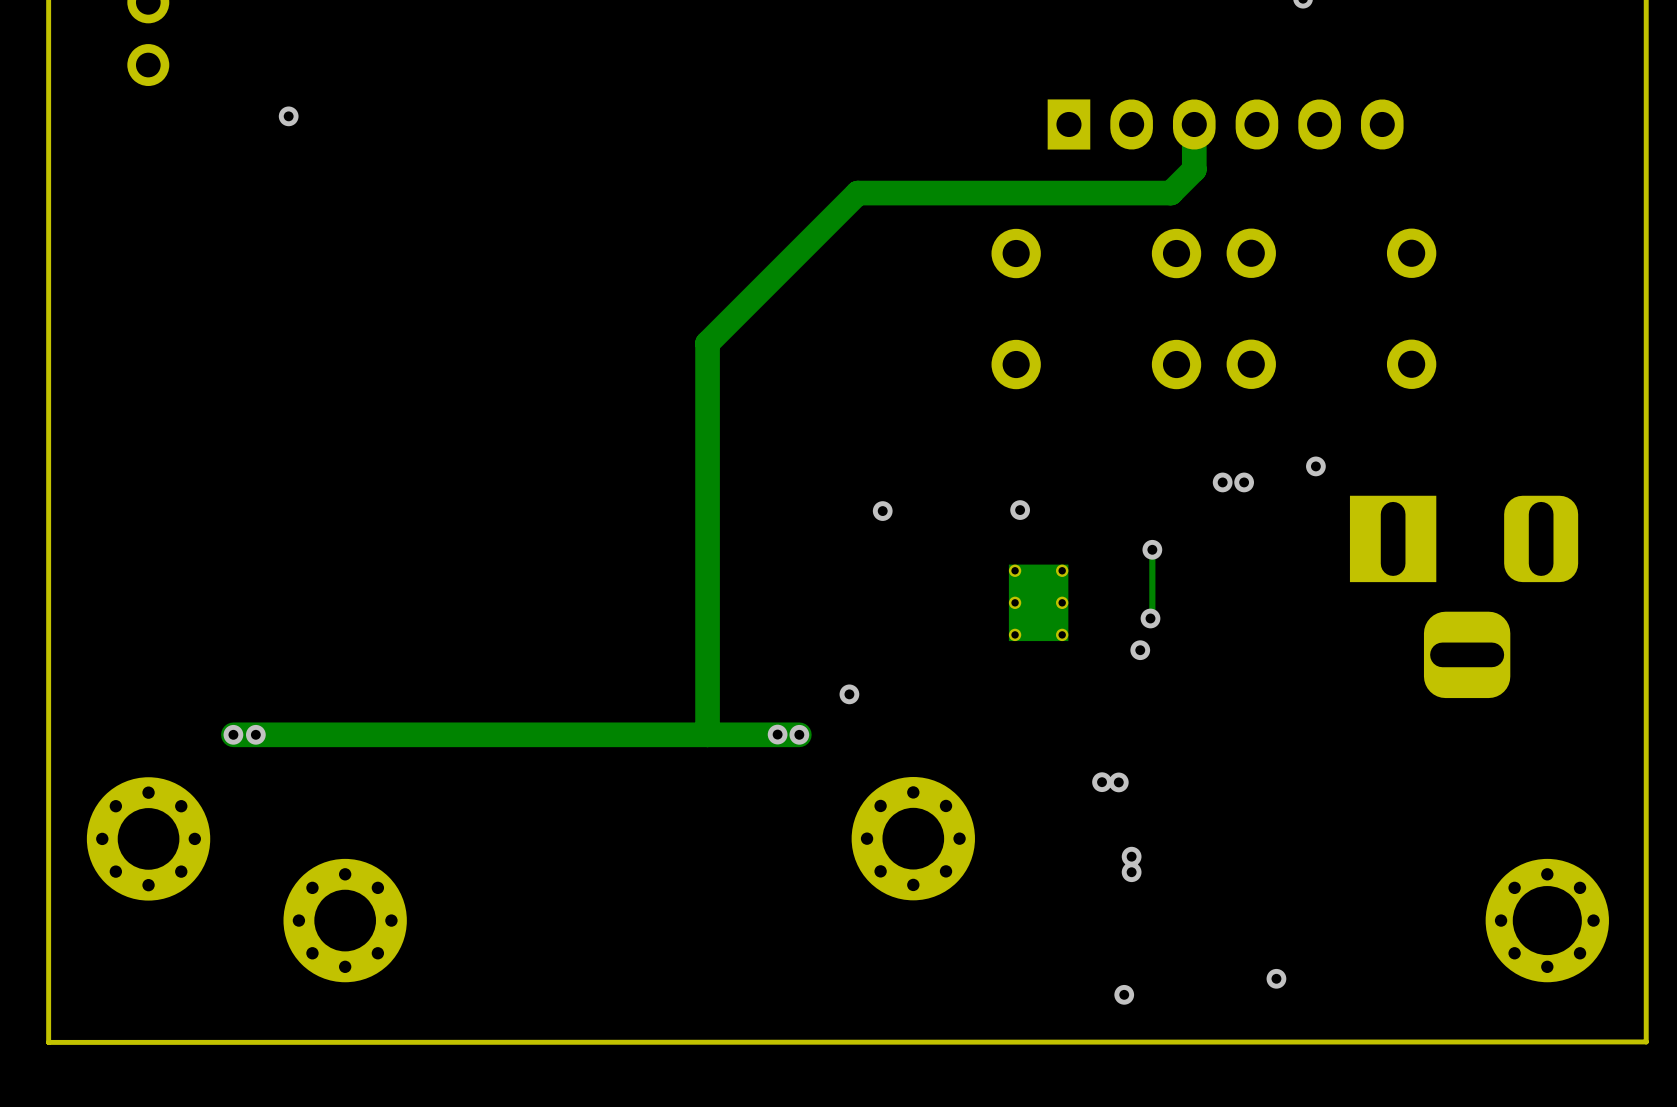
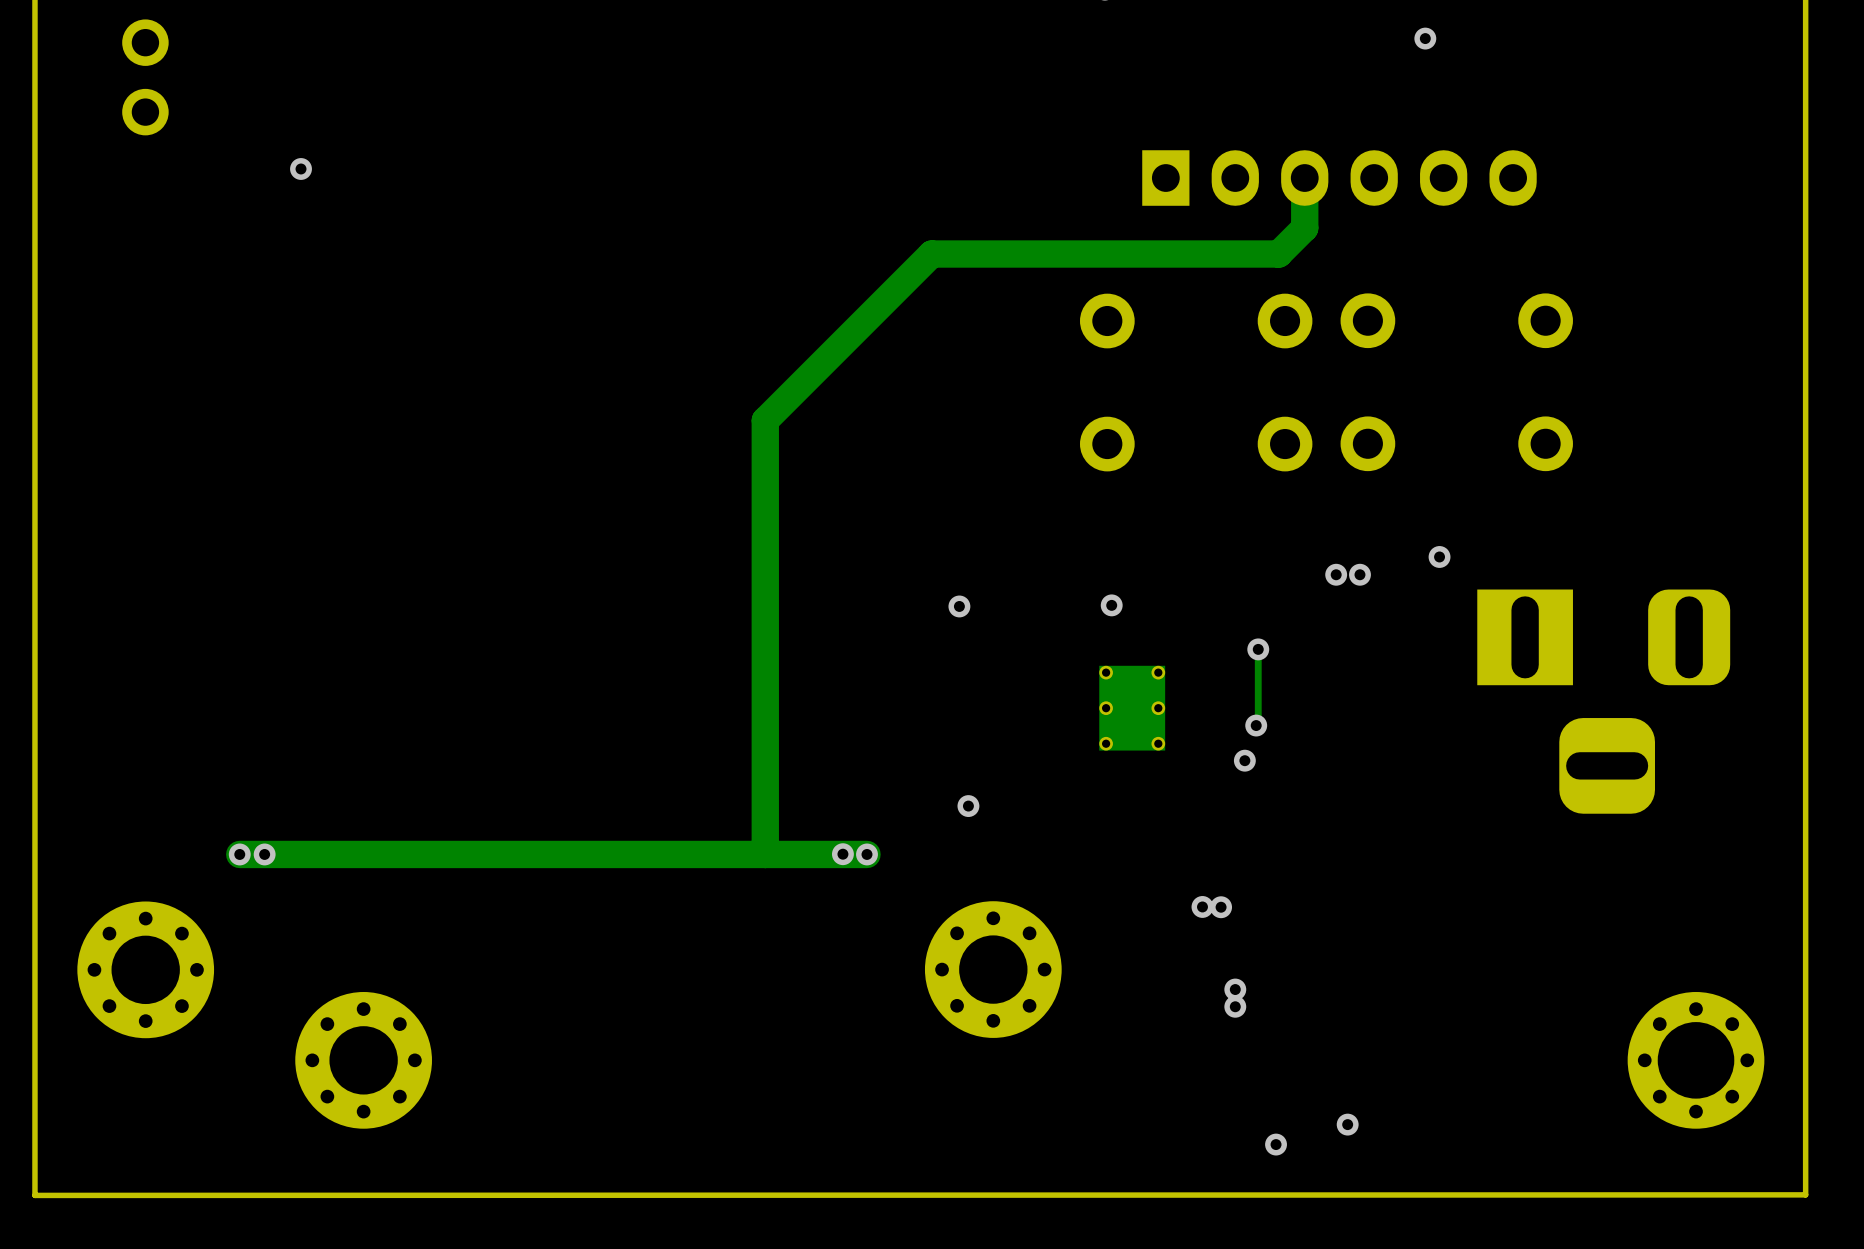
via position: (849, 694) -> (968, 806)
via position: (1276, 978) -> (1347, 1124)
via position: (1124, 994) -> (1276, 1144)

